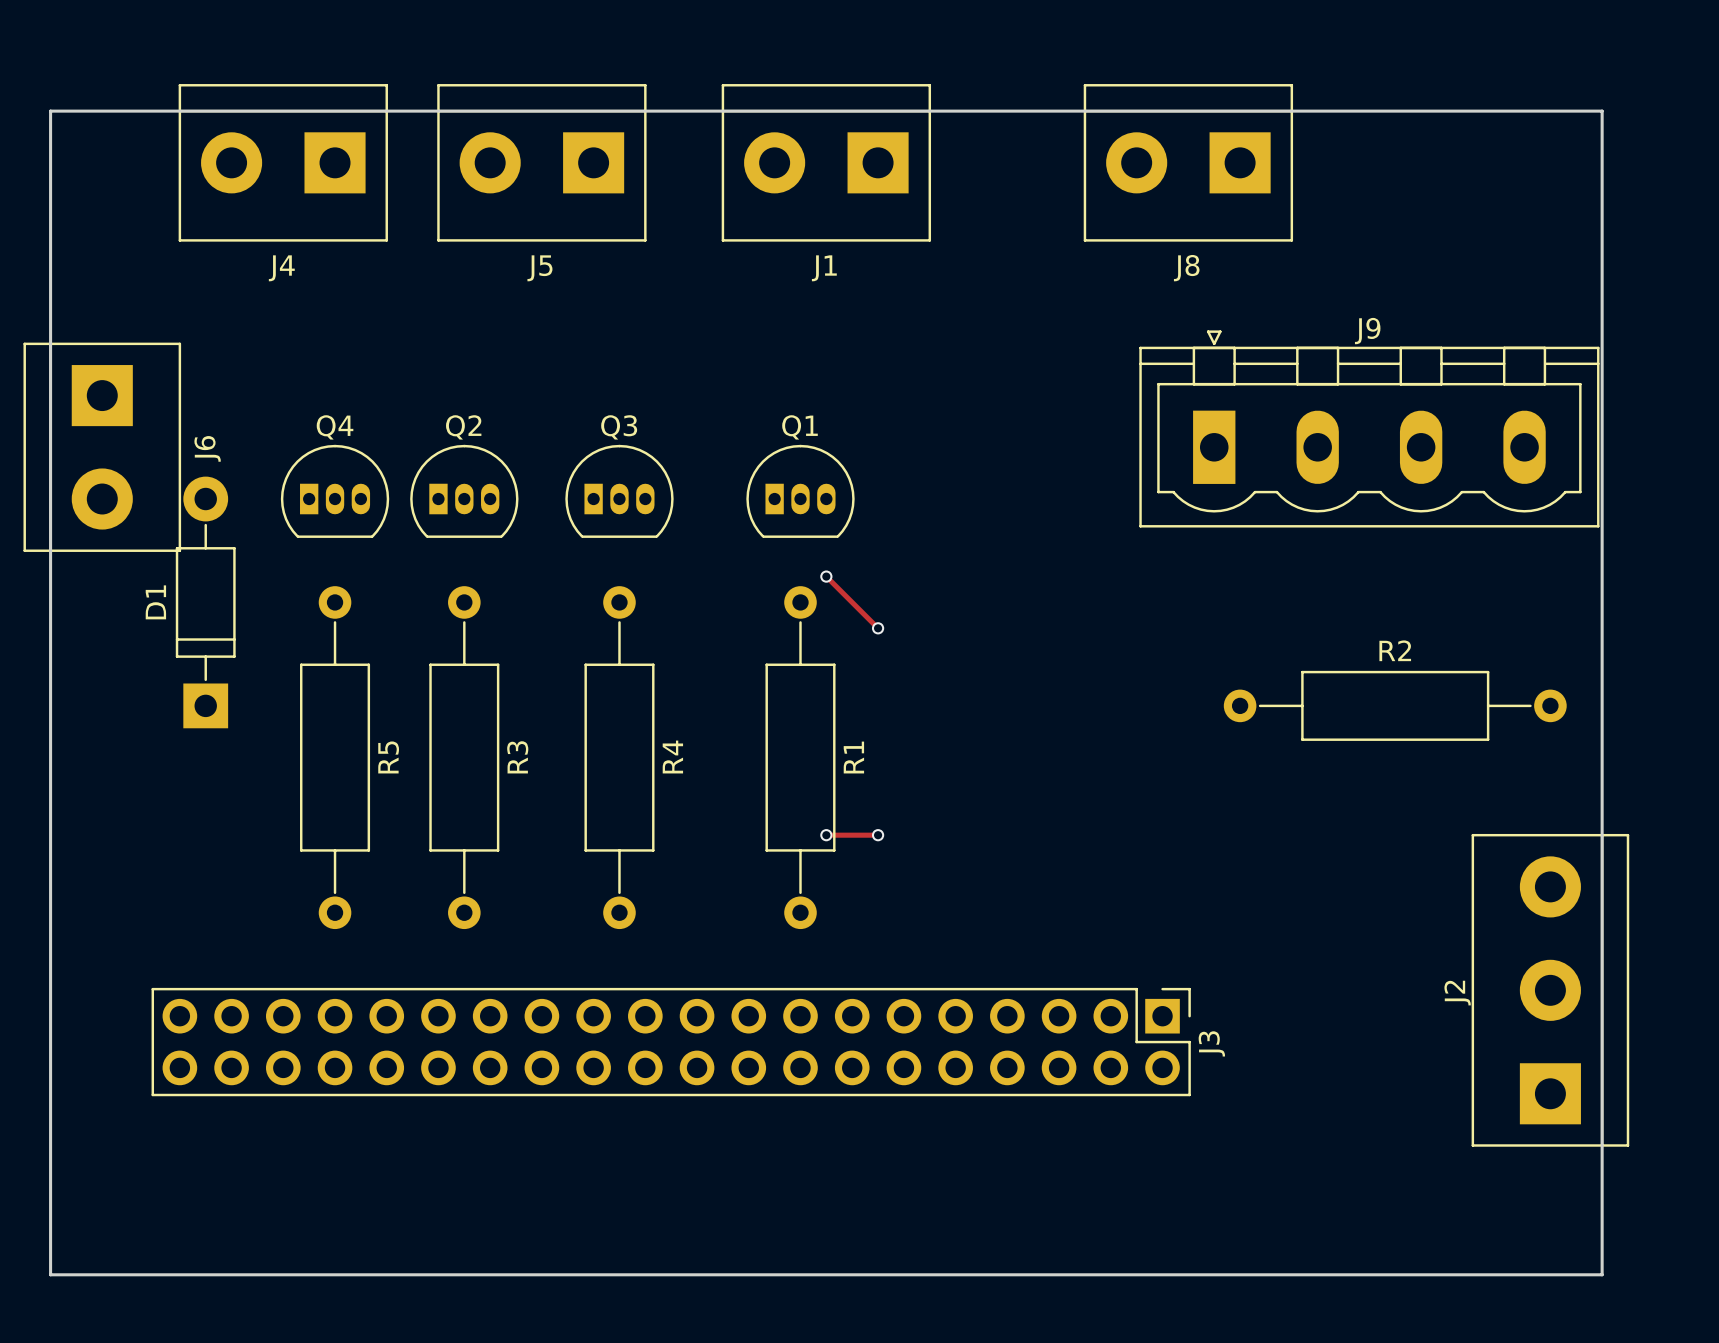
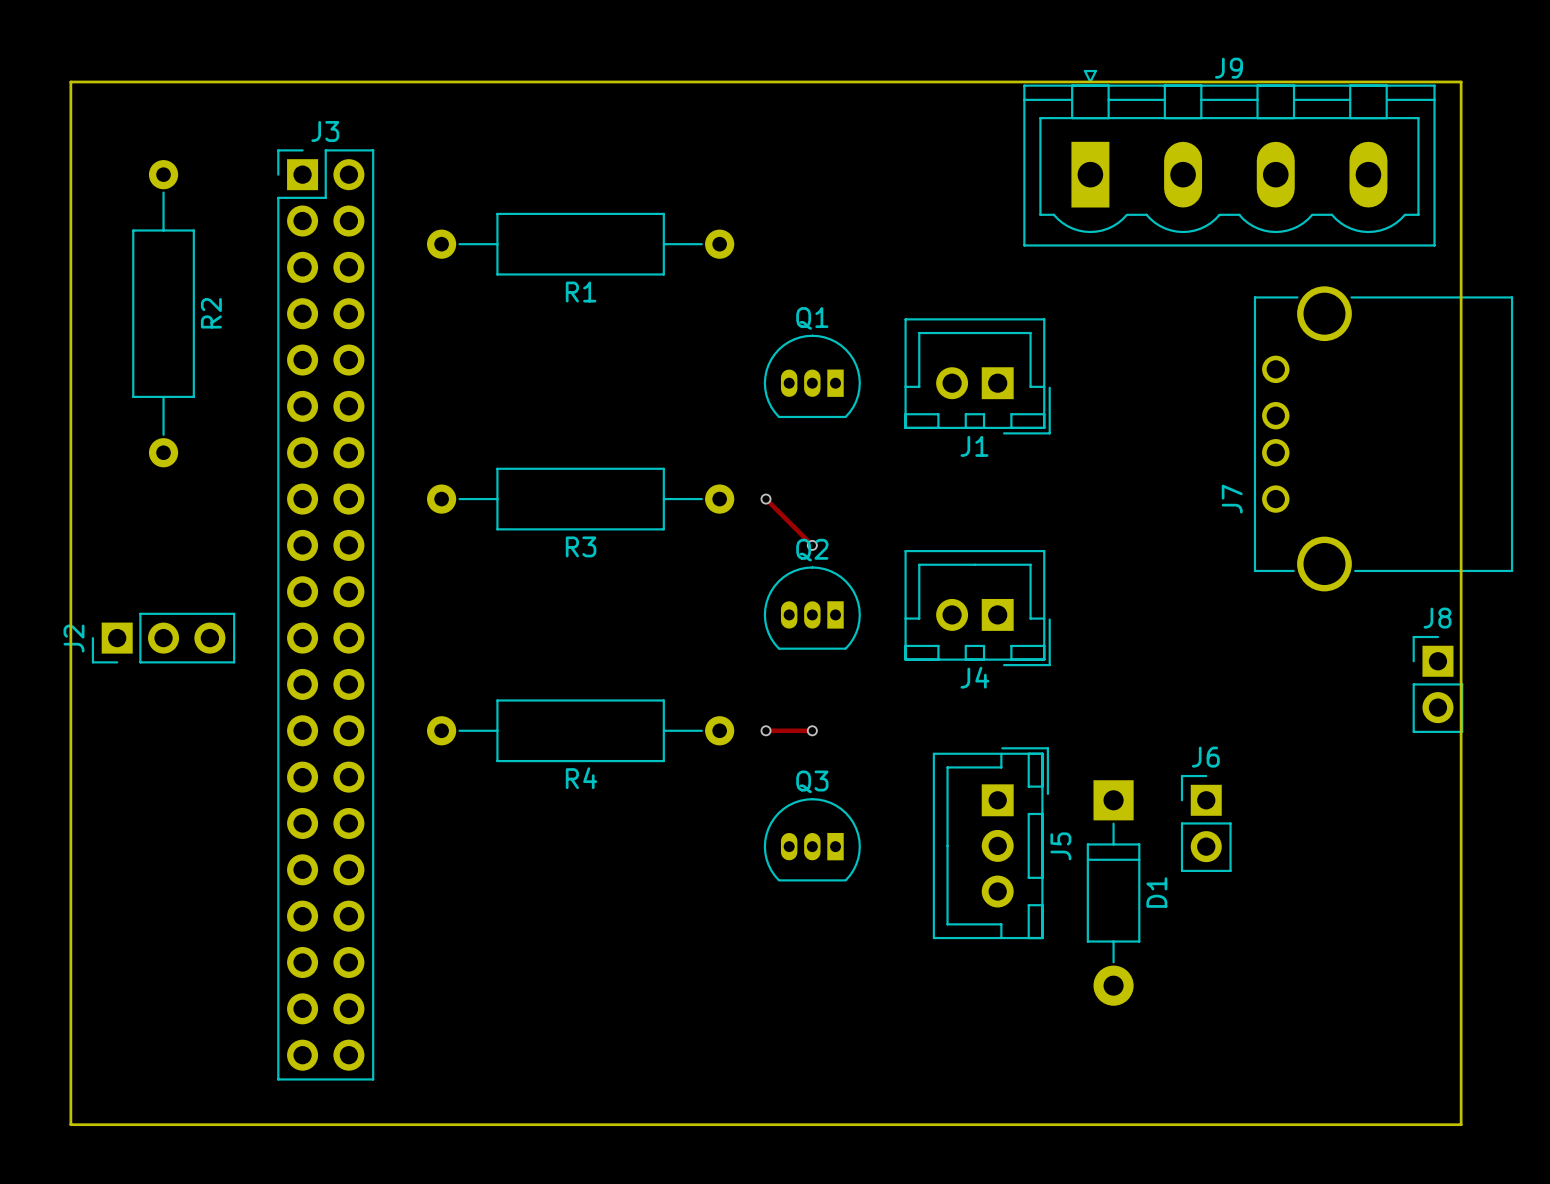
J4 footprint: [178, 84, 388, 242] -> [904, 549, 1051, 667]
J5 footprint: [437, 84, 647, 242] -> [932, 747, 1049, 940]
J1 footprint: [721, 84, 932, 242] -> [904, 318, 1051, 435]
J8 footprint: [1083, 84, 1294, 242] -> [1412, 635, 1464, 733]
J5 name position: J5 (539, 268) -> J5 (1060, 846)
J8 name position: J8 (1186, 268) -> J8 (1437, 618)
J6 footprint: [23, 342, 182, 552] -> [1180, 774, 1232, 873]
J9 position: (1369, 428) -> (1229, 158)
Q2 footprint: [410, 444, 519, 538] -> [763, 566, 861, 650]
Q3 footprint: [565, 444, 674, 538] -> [763, 798, 861, 882]
Q1 footprint: [746, 444, 855, 538] -> [763, 334, 861, 419]
J6 name position: J6 (207, 448) -> J6 (1205, 757)
Q4: (335, 491) -> none
J7: none -> (1383, 438)
D1 rotation: 0° (205, 602) -> 180° (1113, 892)
D1 position: (205, 602) -> (1113, 892)
R2 rotation: 0° (1395, 705) -> 90° clockwise (163, 313)
R2 position: (1395, 705) -> (163, 313)
R5: (335, 757) -> none
R3 rotation: 0° (464, 757) -> 90° clockwise (580, 499)
R3 position: (464, 757) -> (580, 499)
R4 rotation: 0° (619, 757) -> 90° clockwise (580, 730)
R1 rotation: 0° (800, 757) -> 90° clockwise (580, 244)
R1 position: (800, 757) -> (580, 244)
J2 footprint: [1471, 833, 1630, 1147] -> [91, 612, 236, 664]
J3 rotation: 0° (671, 1042) -> 90° counterclockwise (325, 614)

